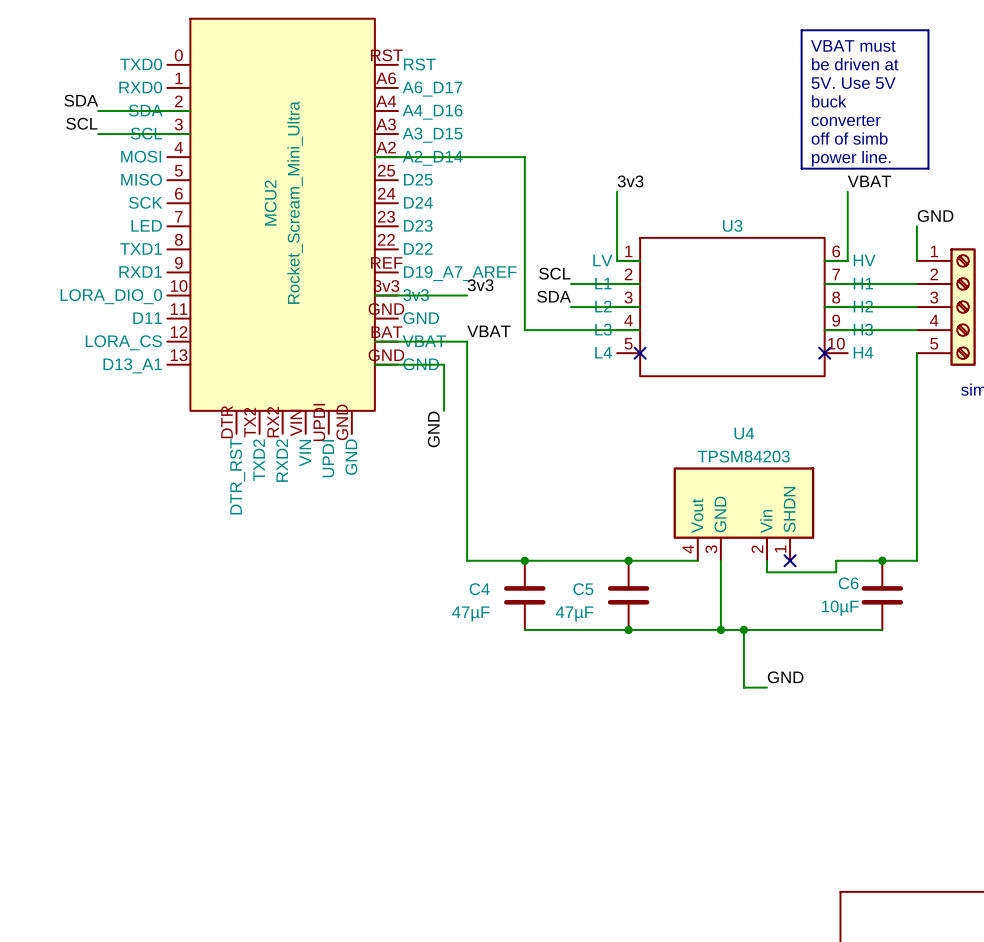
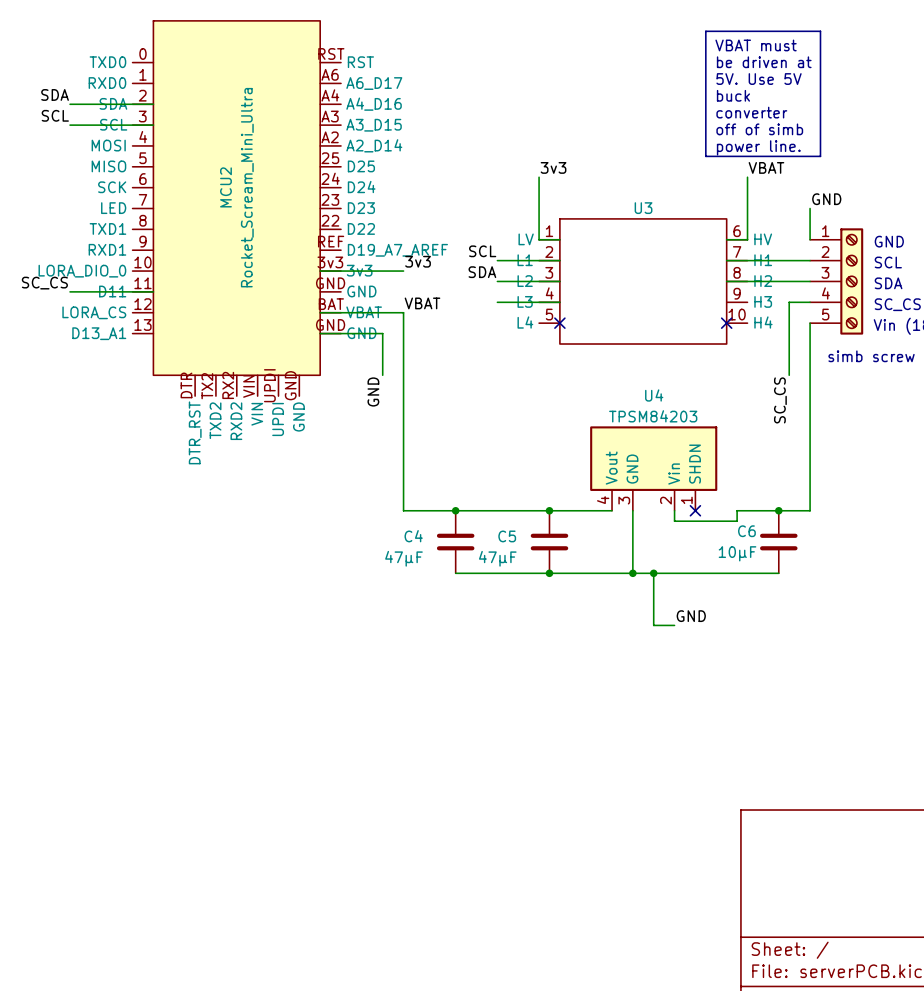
wire: (374, 157) (524, 157) (524, 330) (570, 330) -> none
label: none -> SC_CS (44, 283)
wire: none -> (70, 291) (153, 291)
wire: (824, 330) (893, 330) -> (789, 375) (789, 302)
label: none -> SC_CS (780, 400)

